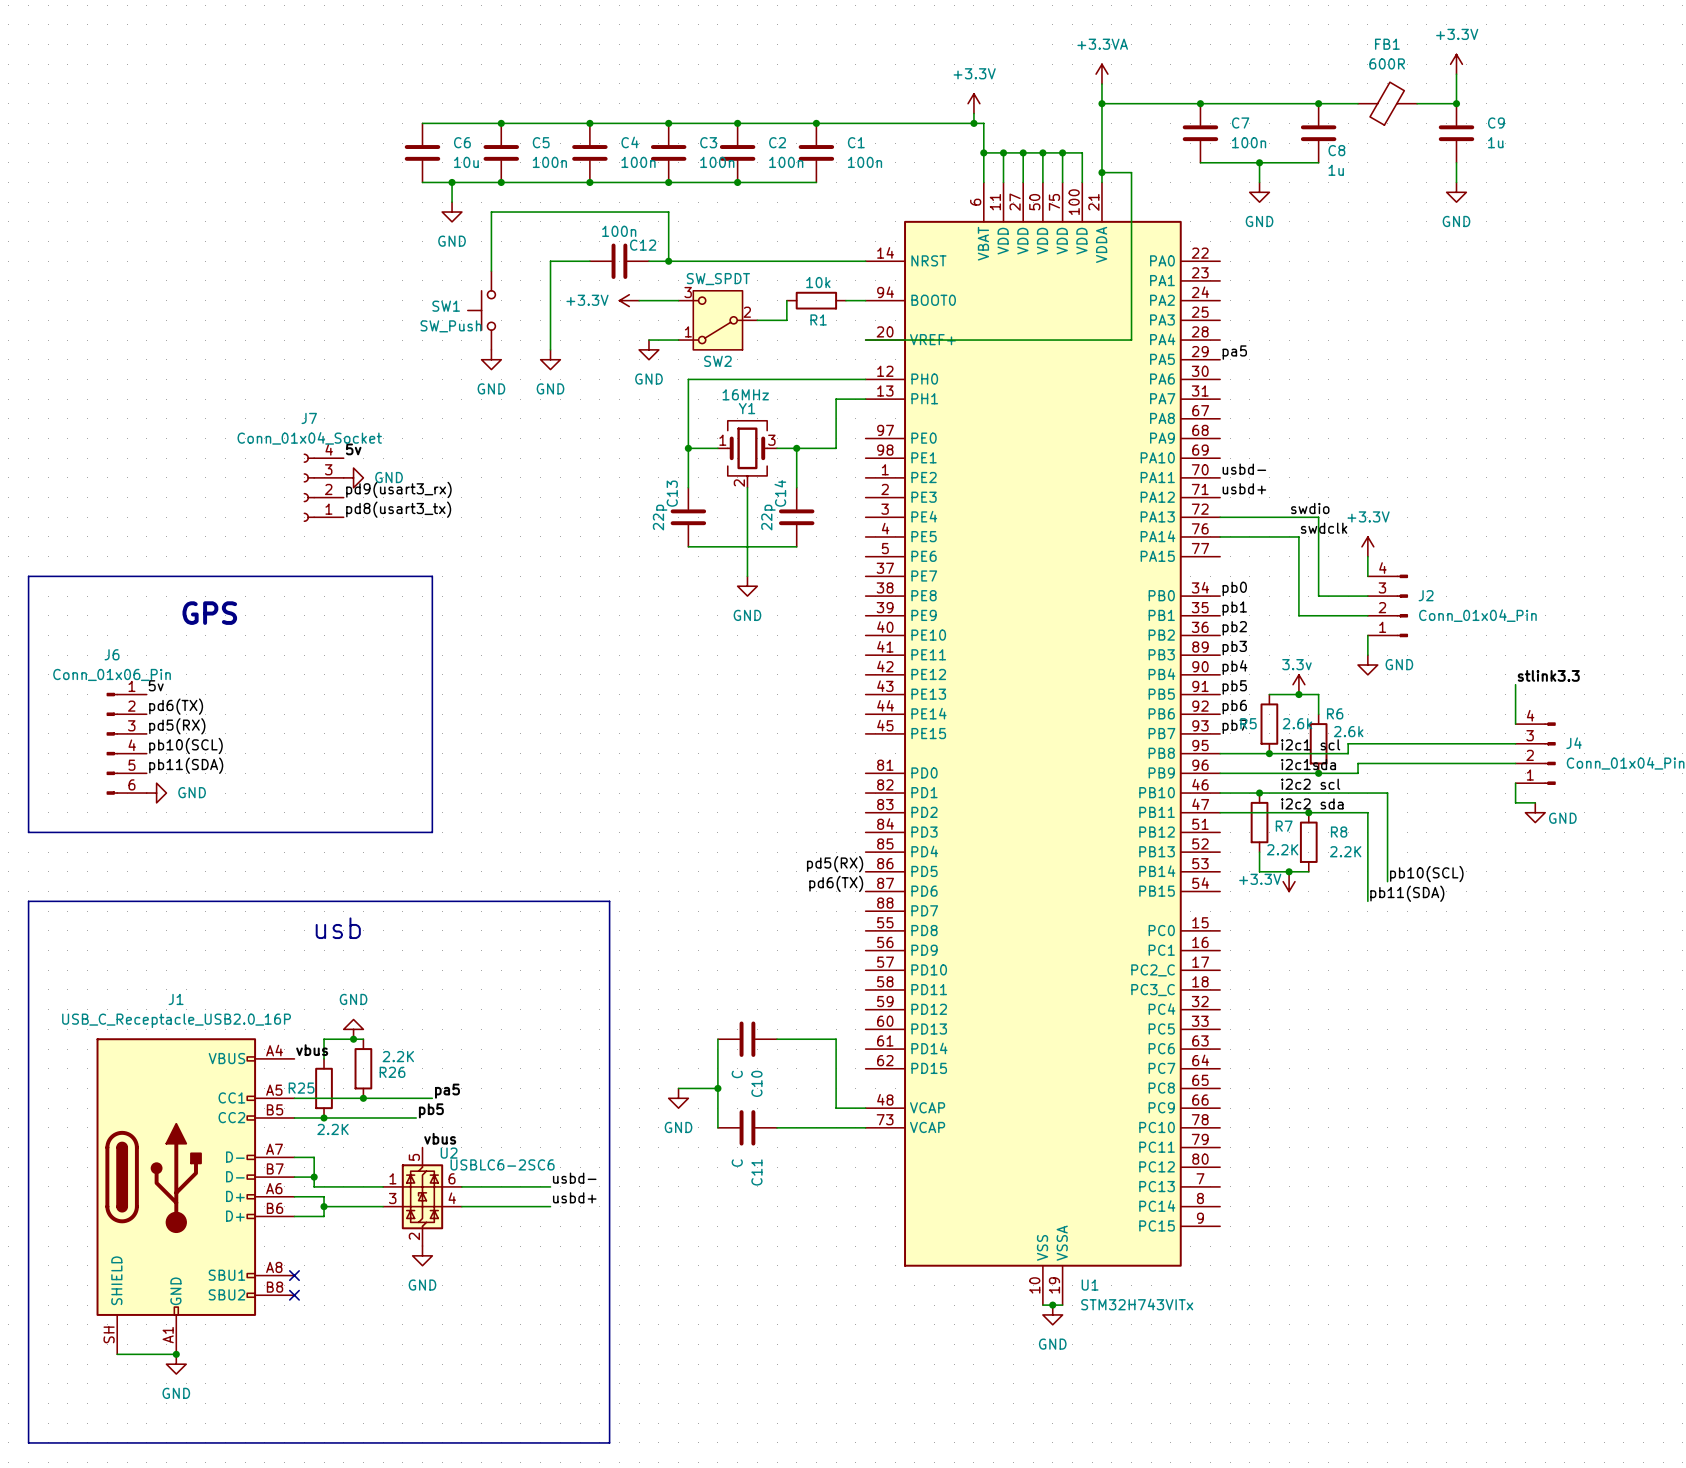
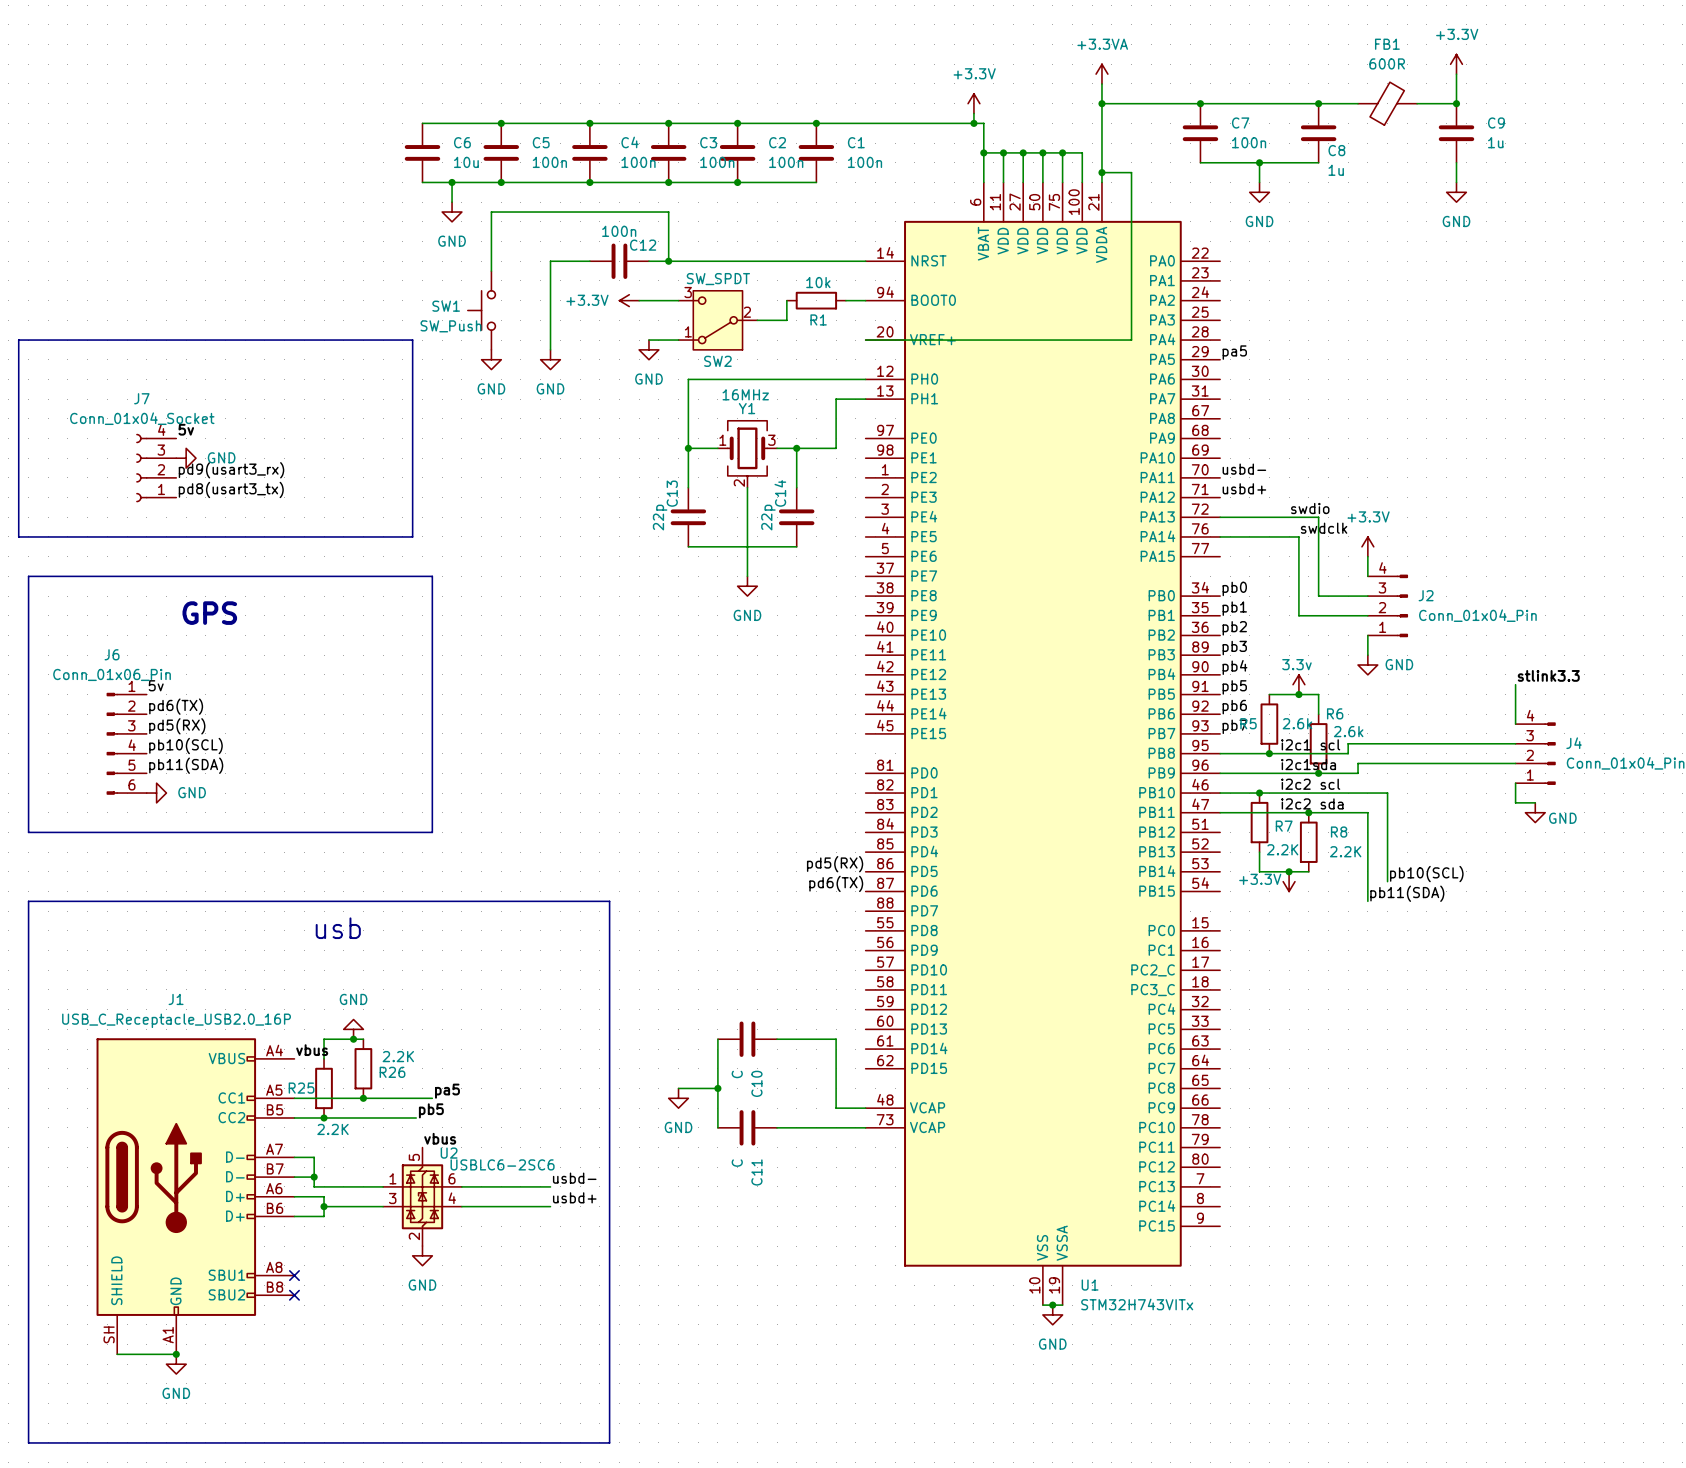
line: none -> (18, 340) (412, 340) (412, 536) (18, 536) (18, 340)
label position: 5v (353, 449) -> 5v (186, 429)
power symbol position: GND (353, 477) -> GND (186, 458)
J7 position: (323, 487) -> (156, 468)
label position: pd9(usart3_rx) (398, 489) -> pd9(usart3_rx) (231, 470)
label position: pd8(usart3_tx) (398, 509) -> pd8(usart3_tx) (231, 489)

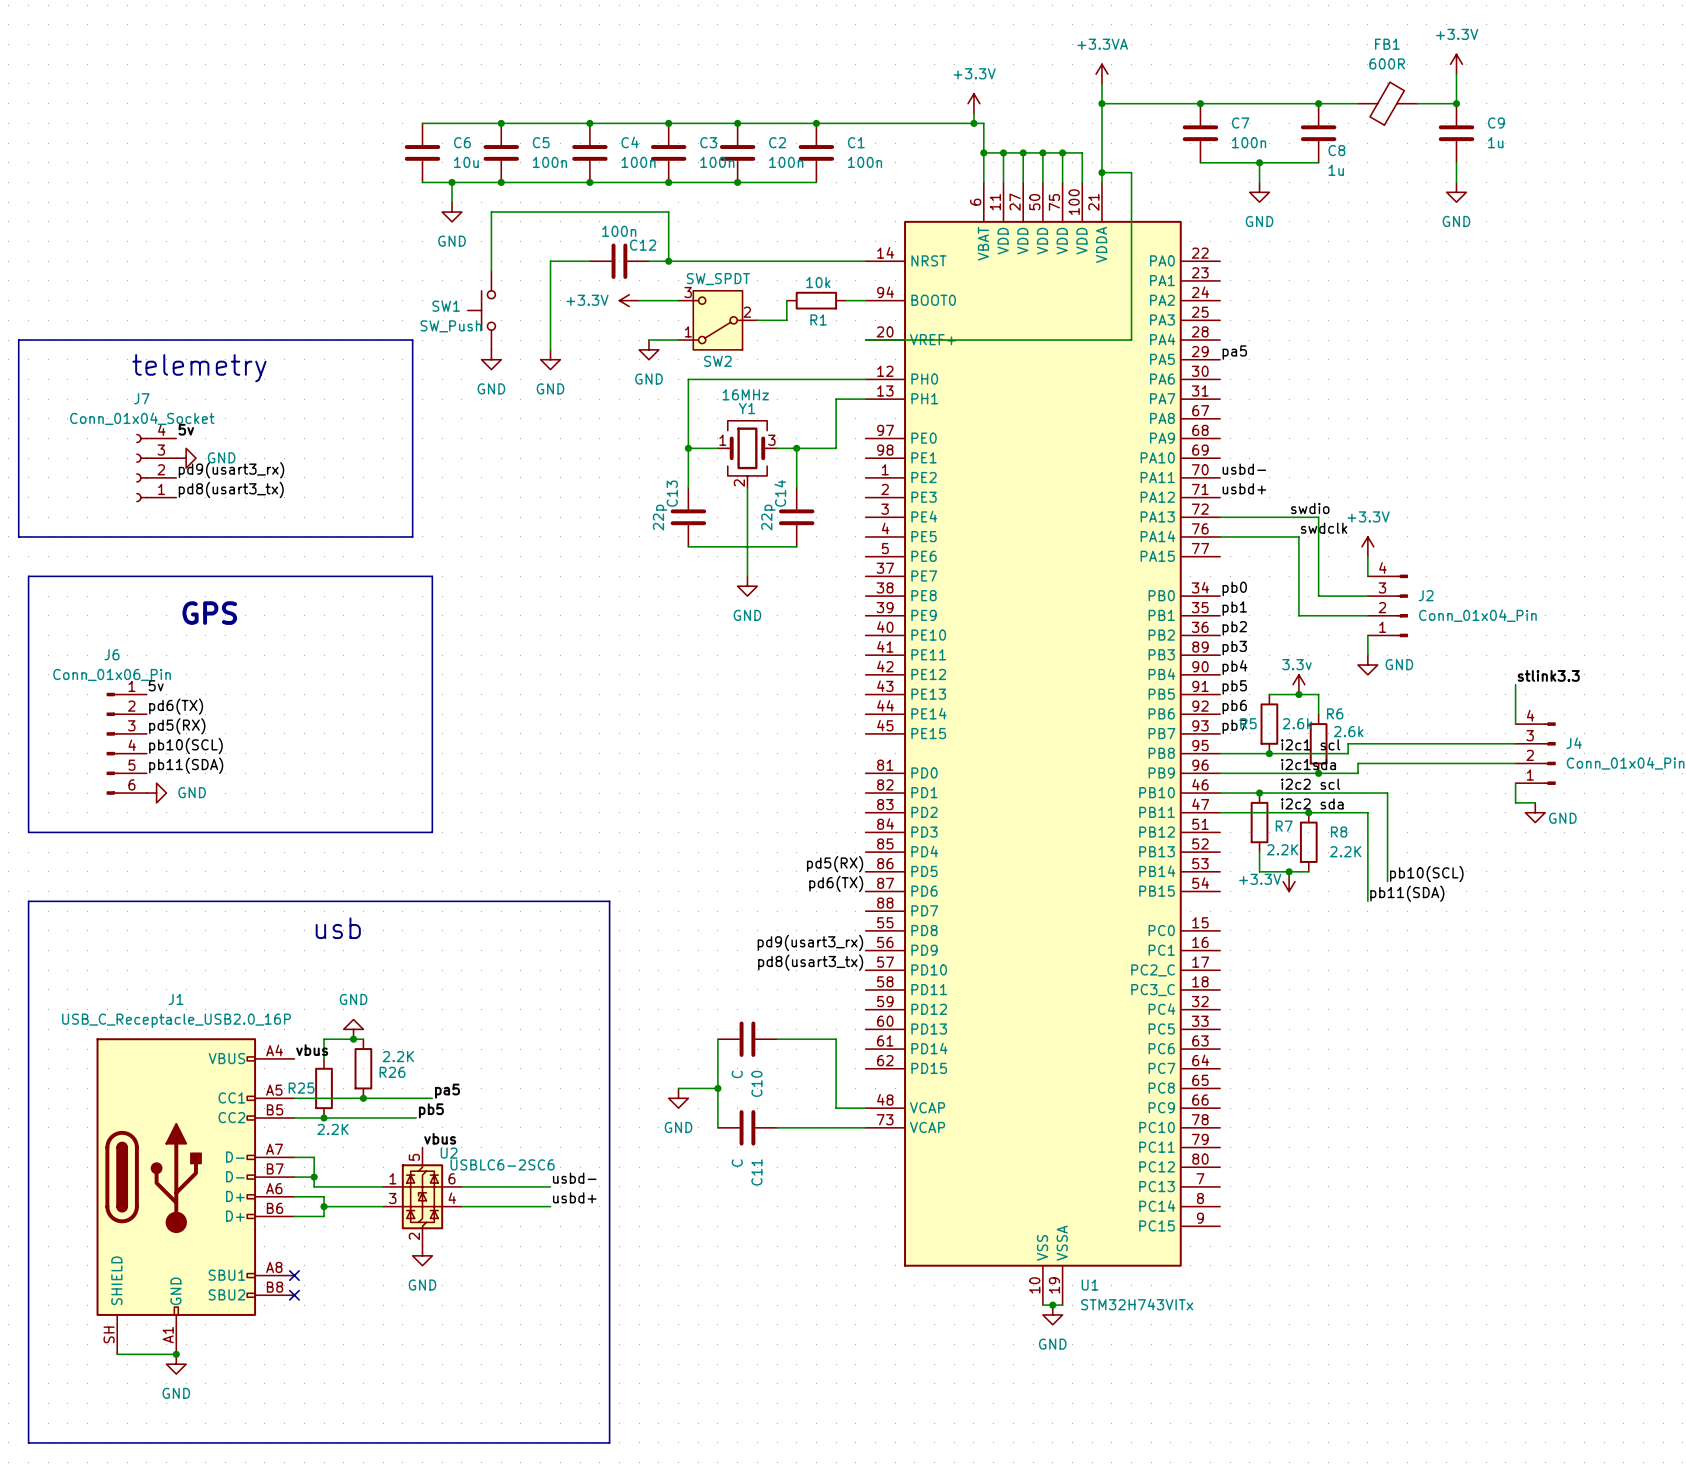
text: none -> telemetry (199, 368)
label: none -> pd9(usart3_rx) (810, 942)
label: none -> pd8(usart3_tx) (810, 962)

